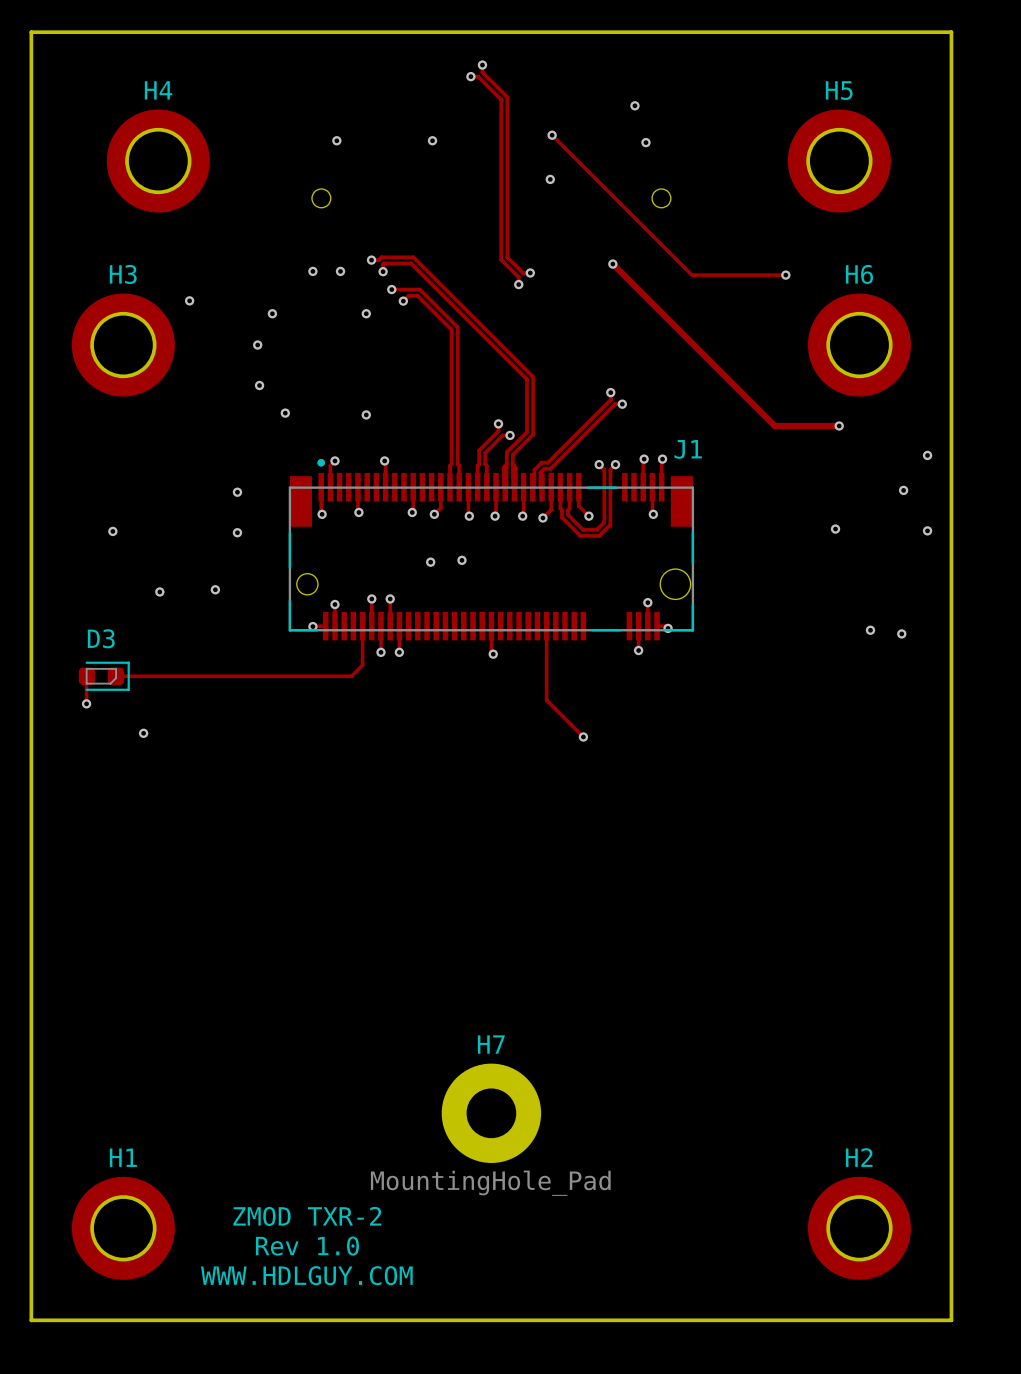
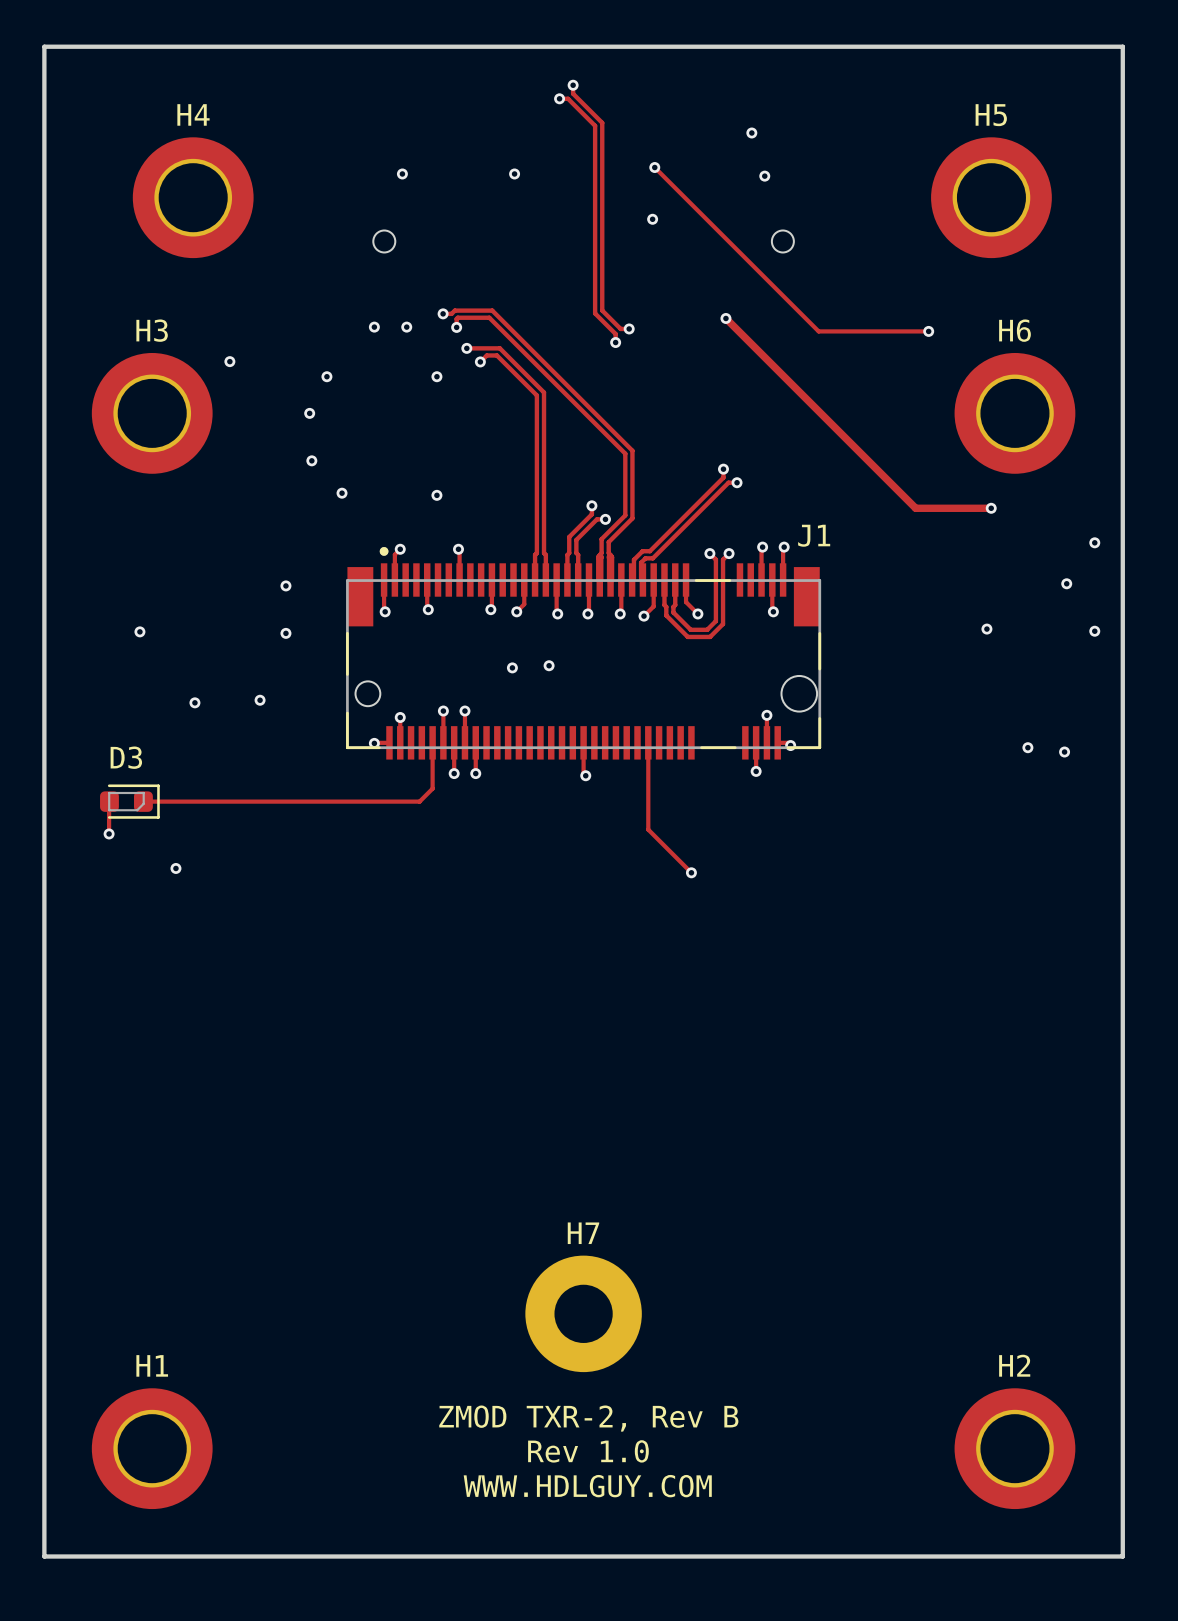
H7 value: MountingHole_Pad (490, 1183) -> none
text: ZMOD TXR-2 (307, 1216) -> ZMOD TXR-2, Rev B (588, 1418)
text position: Rev 1.0 (307, 1246) -> Rev 1.0 (588, 1451)
text position: WWW.HDLGUY.COM (306, 1275) -> WWW.HDLGUY.COM (587, 1486)

